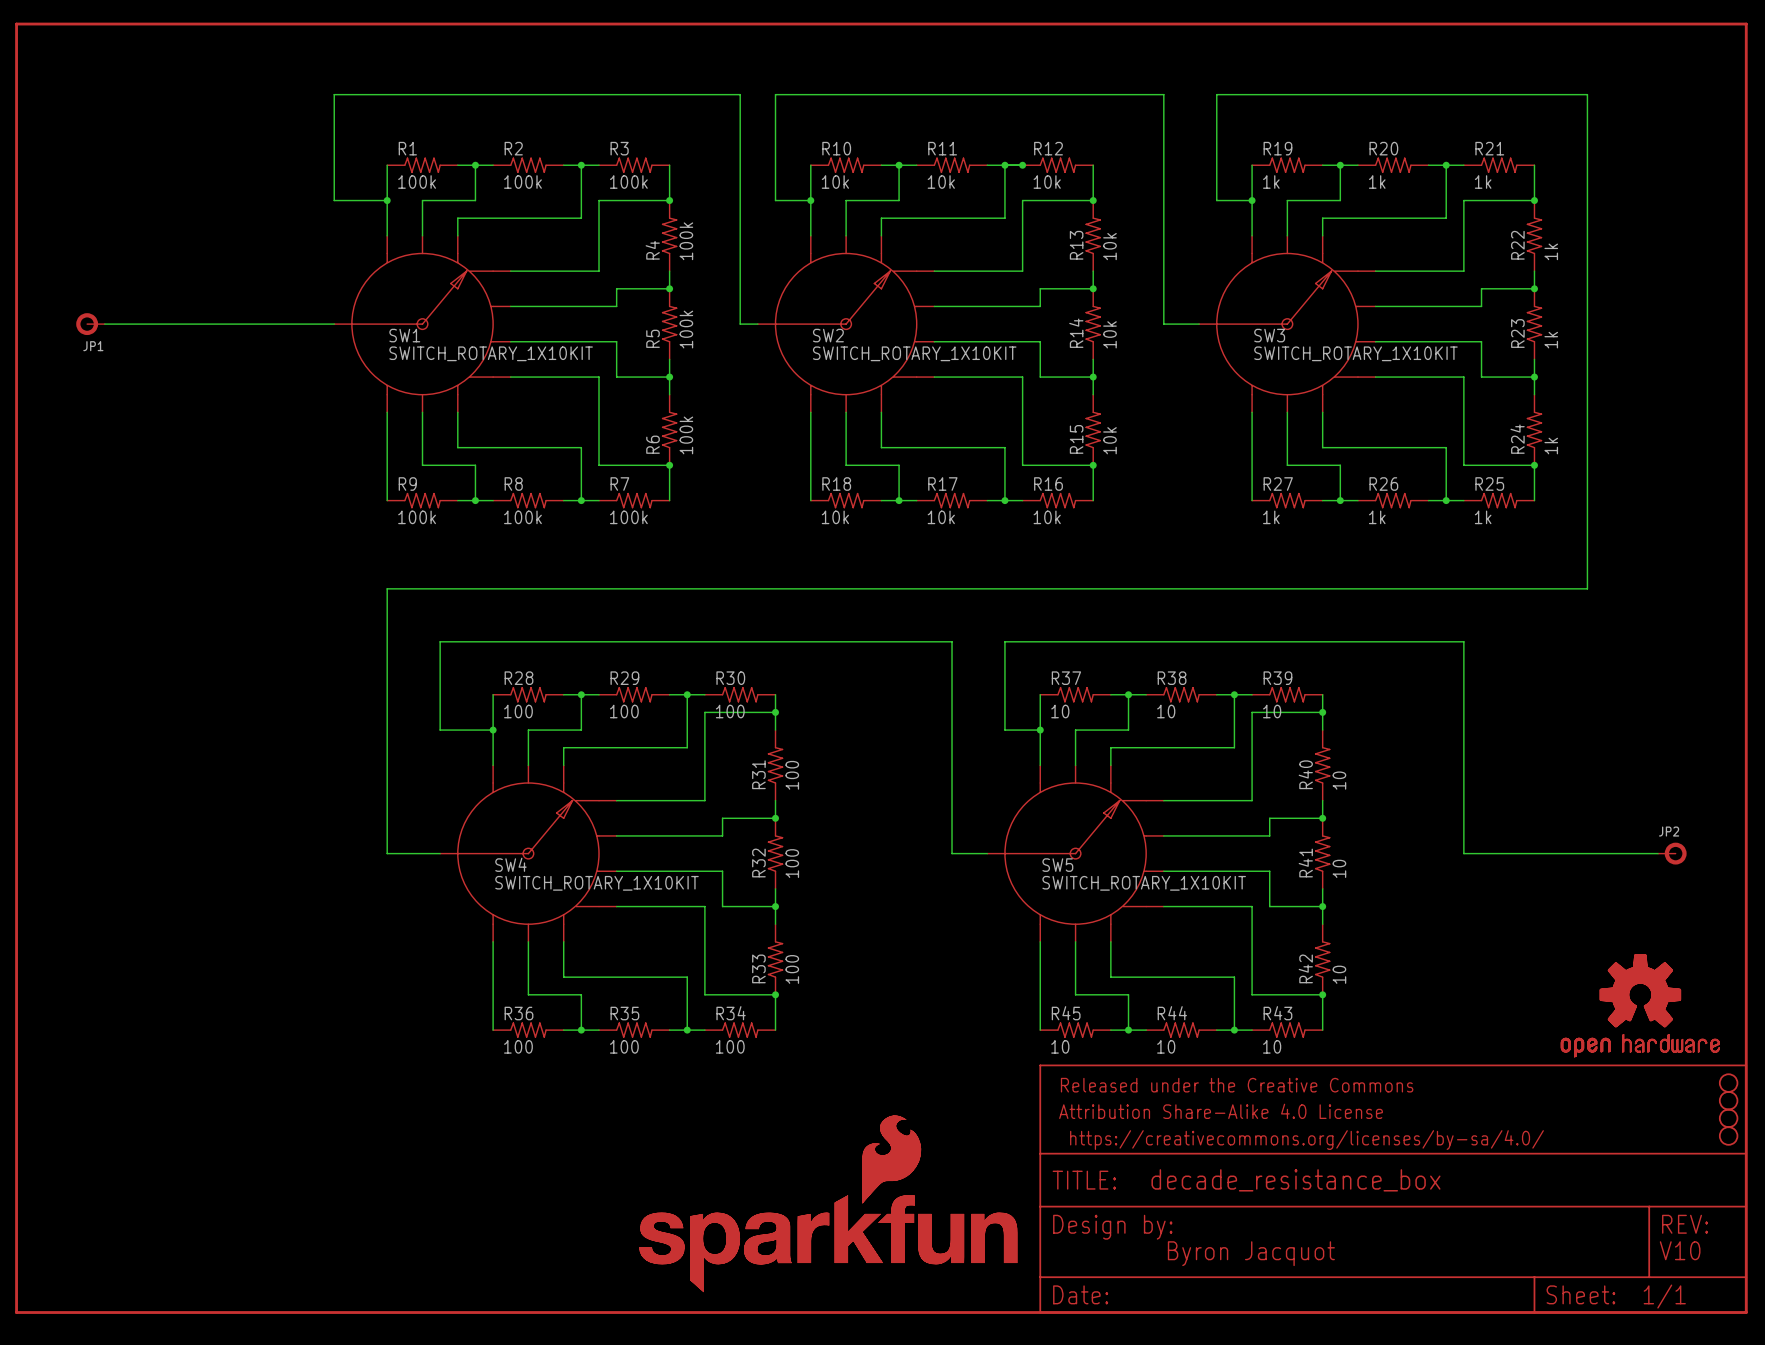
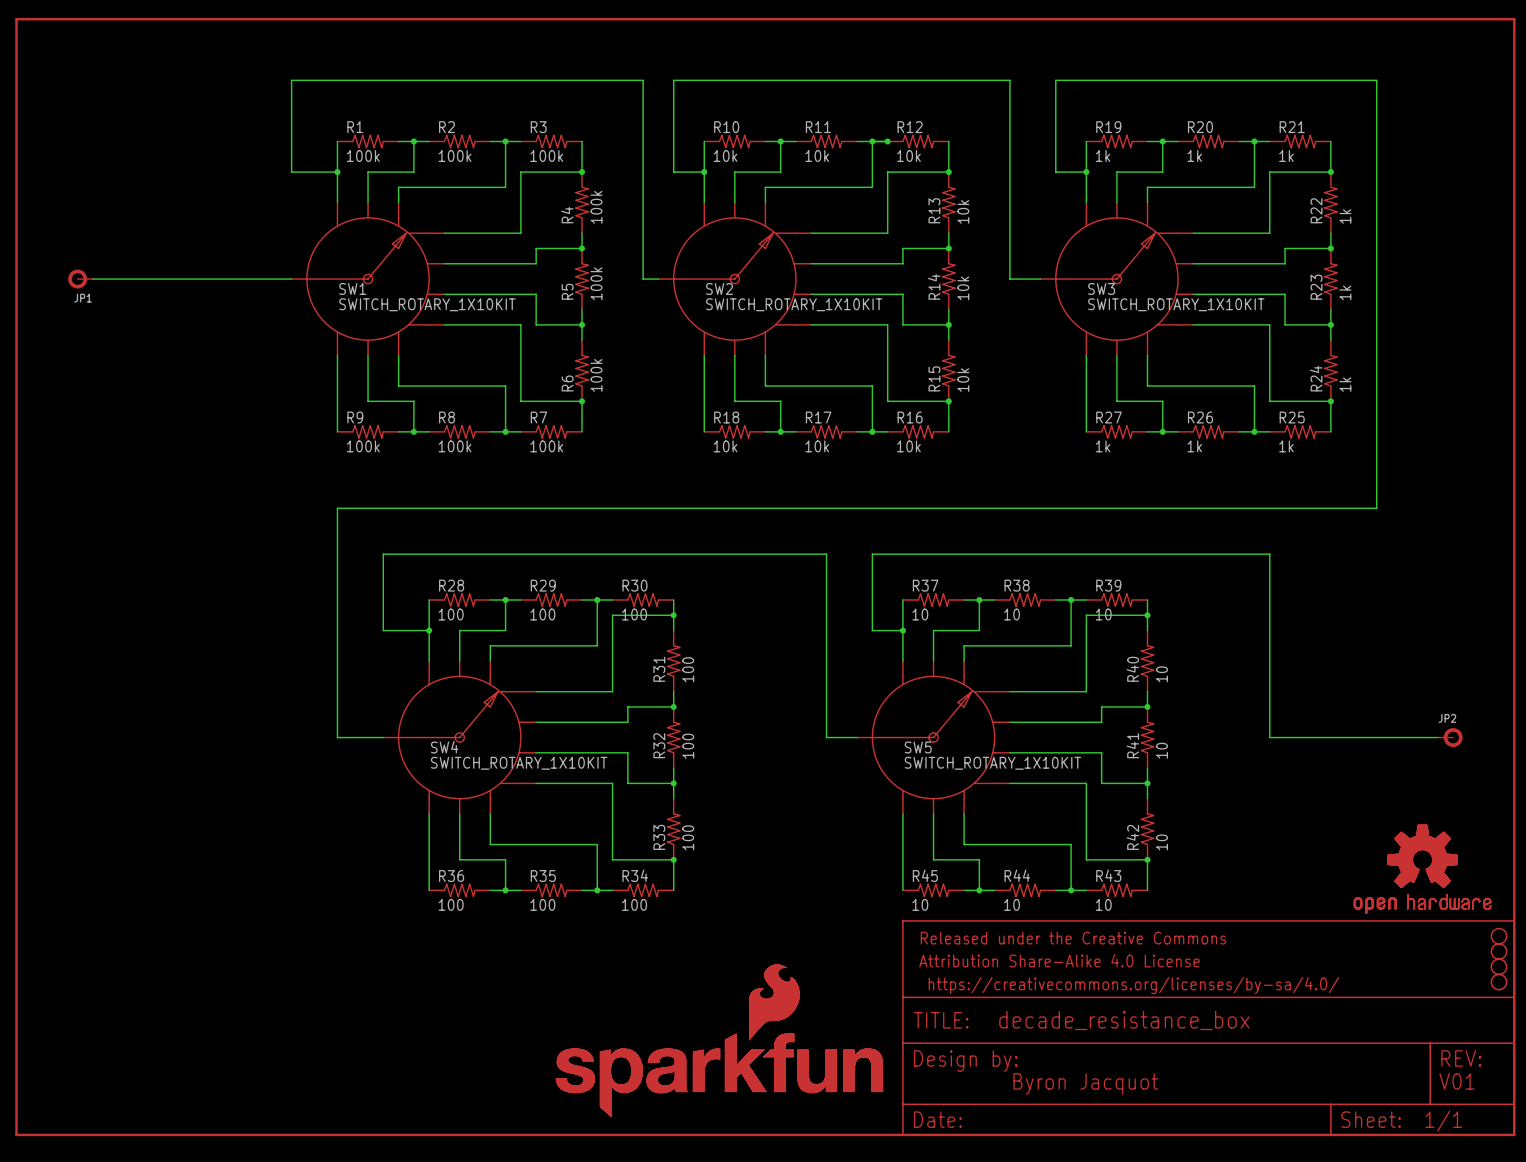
text: V10 (1680, 1250) -> V01 (1457, 1081)

